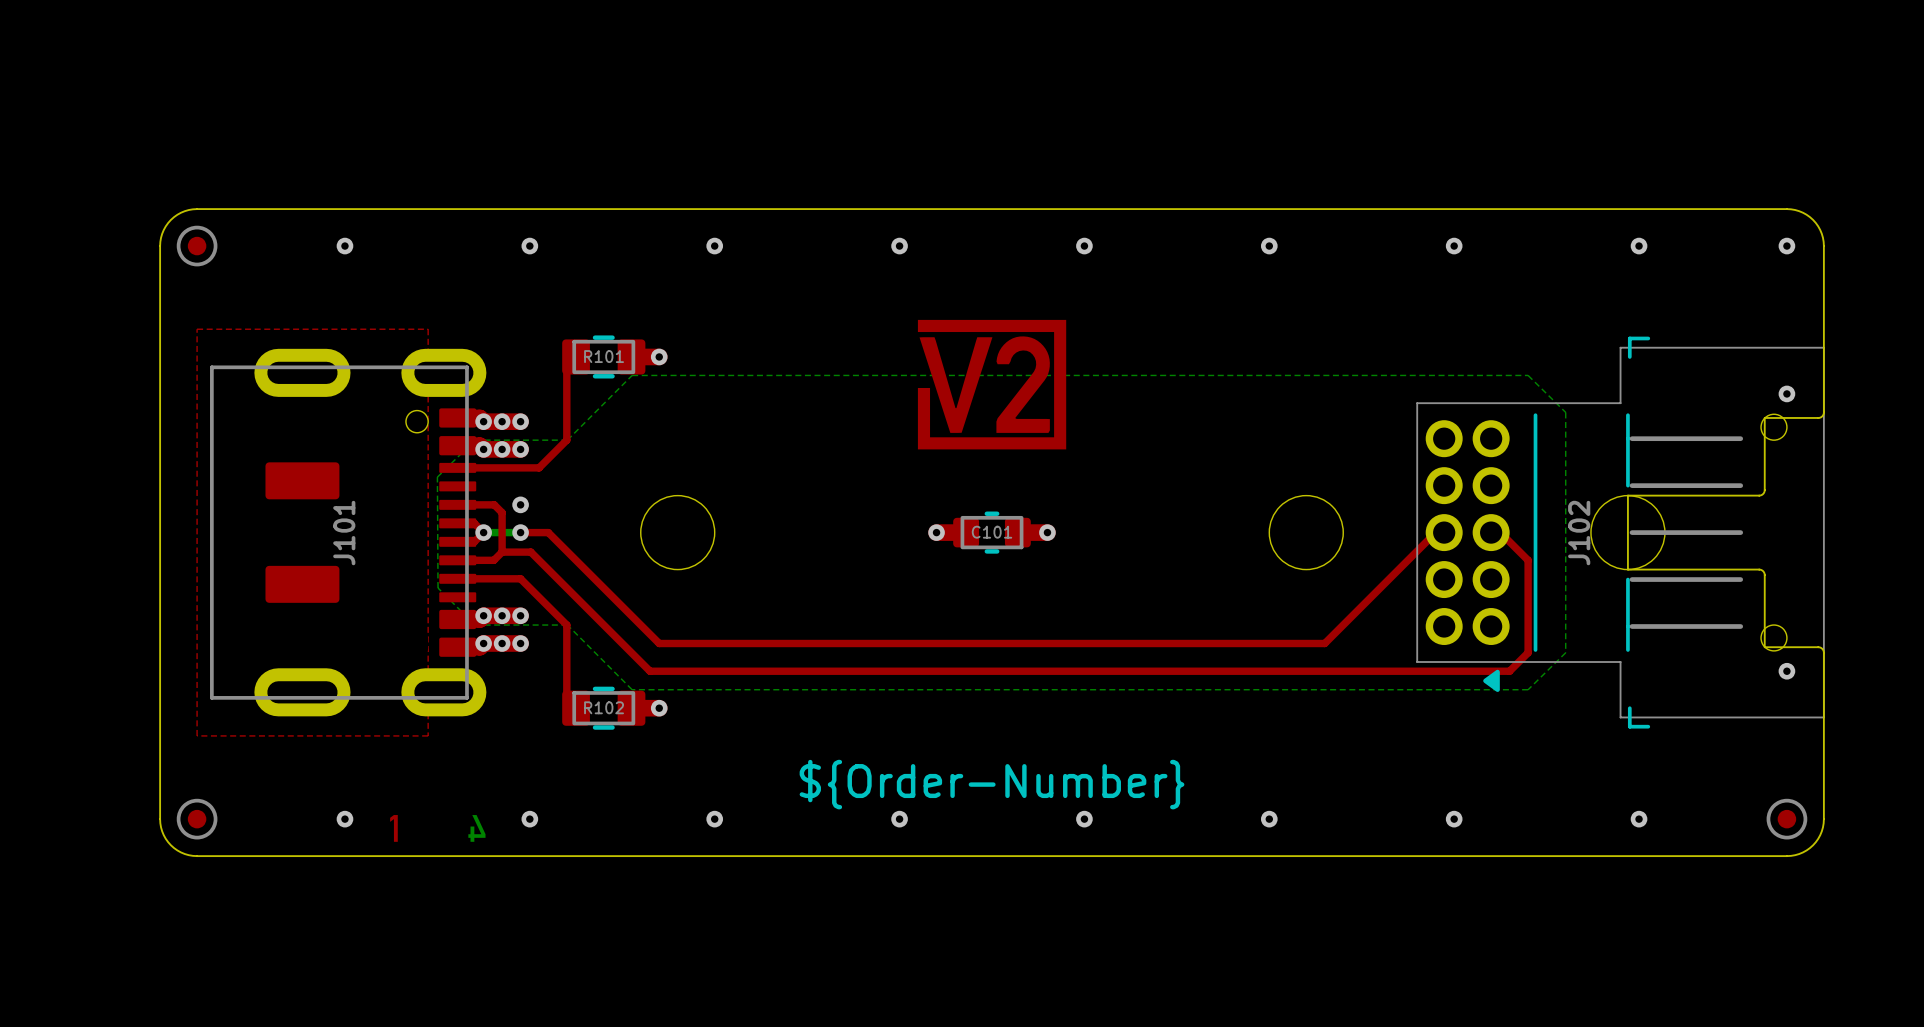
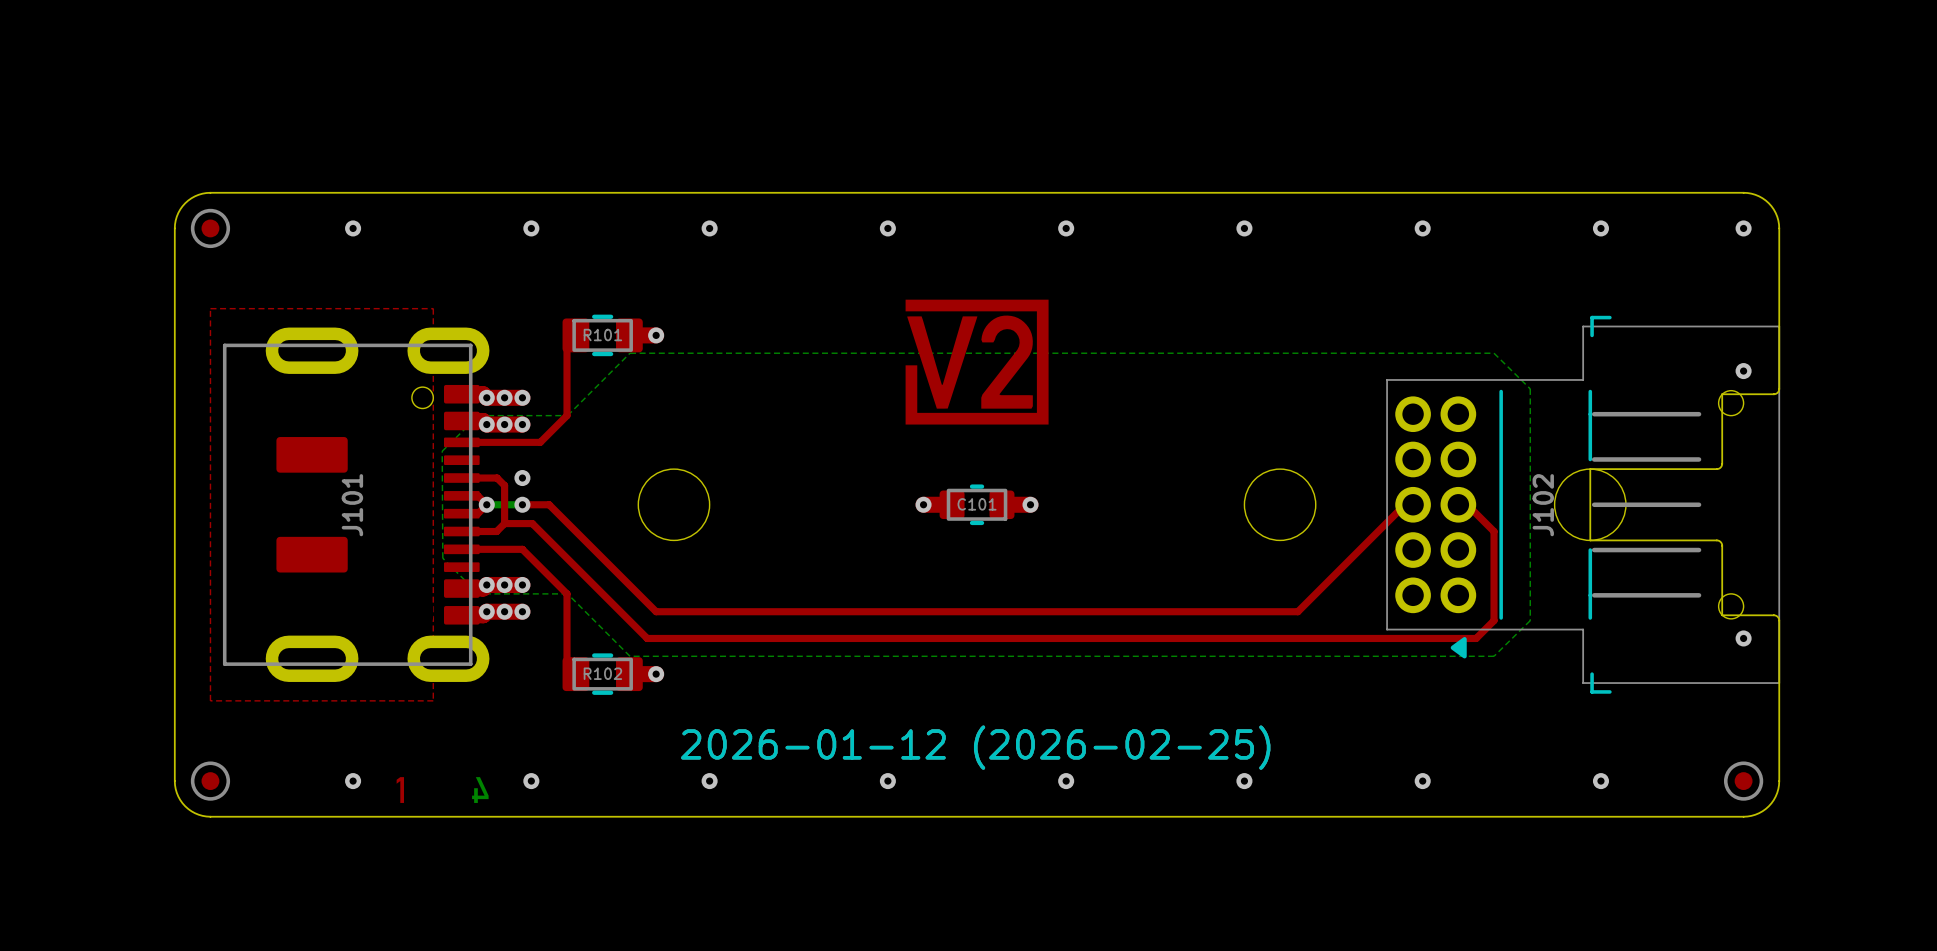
drawing shape: [799, 759, 1185, 810] -> [681, 725, 1271, 770]

